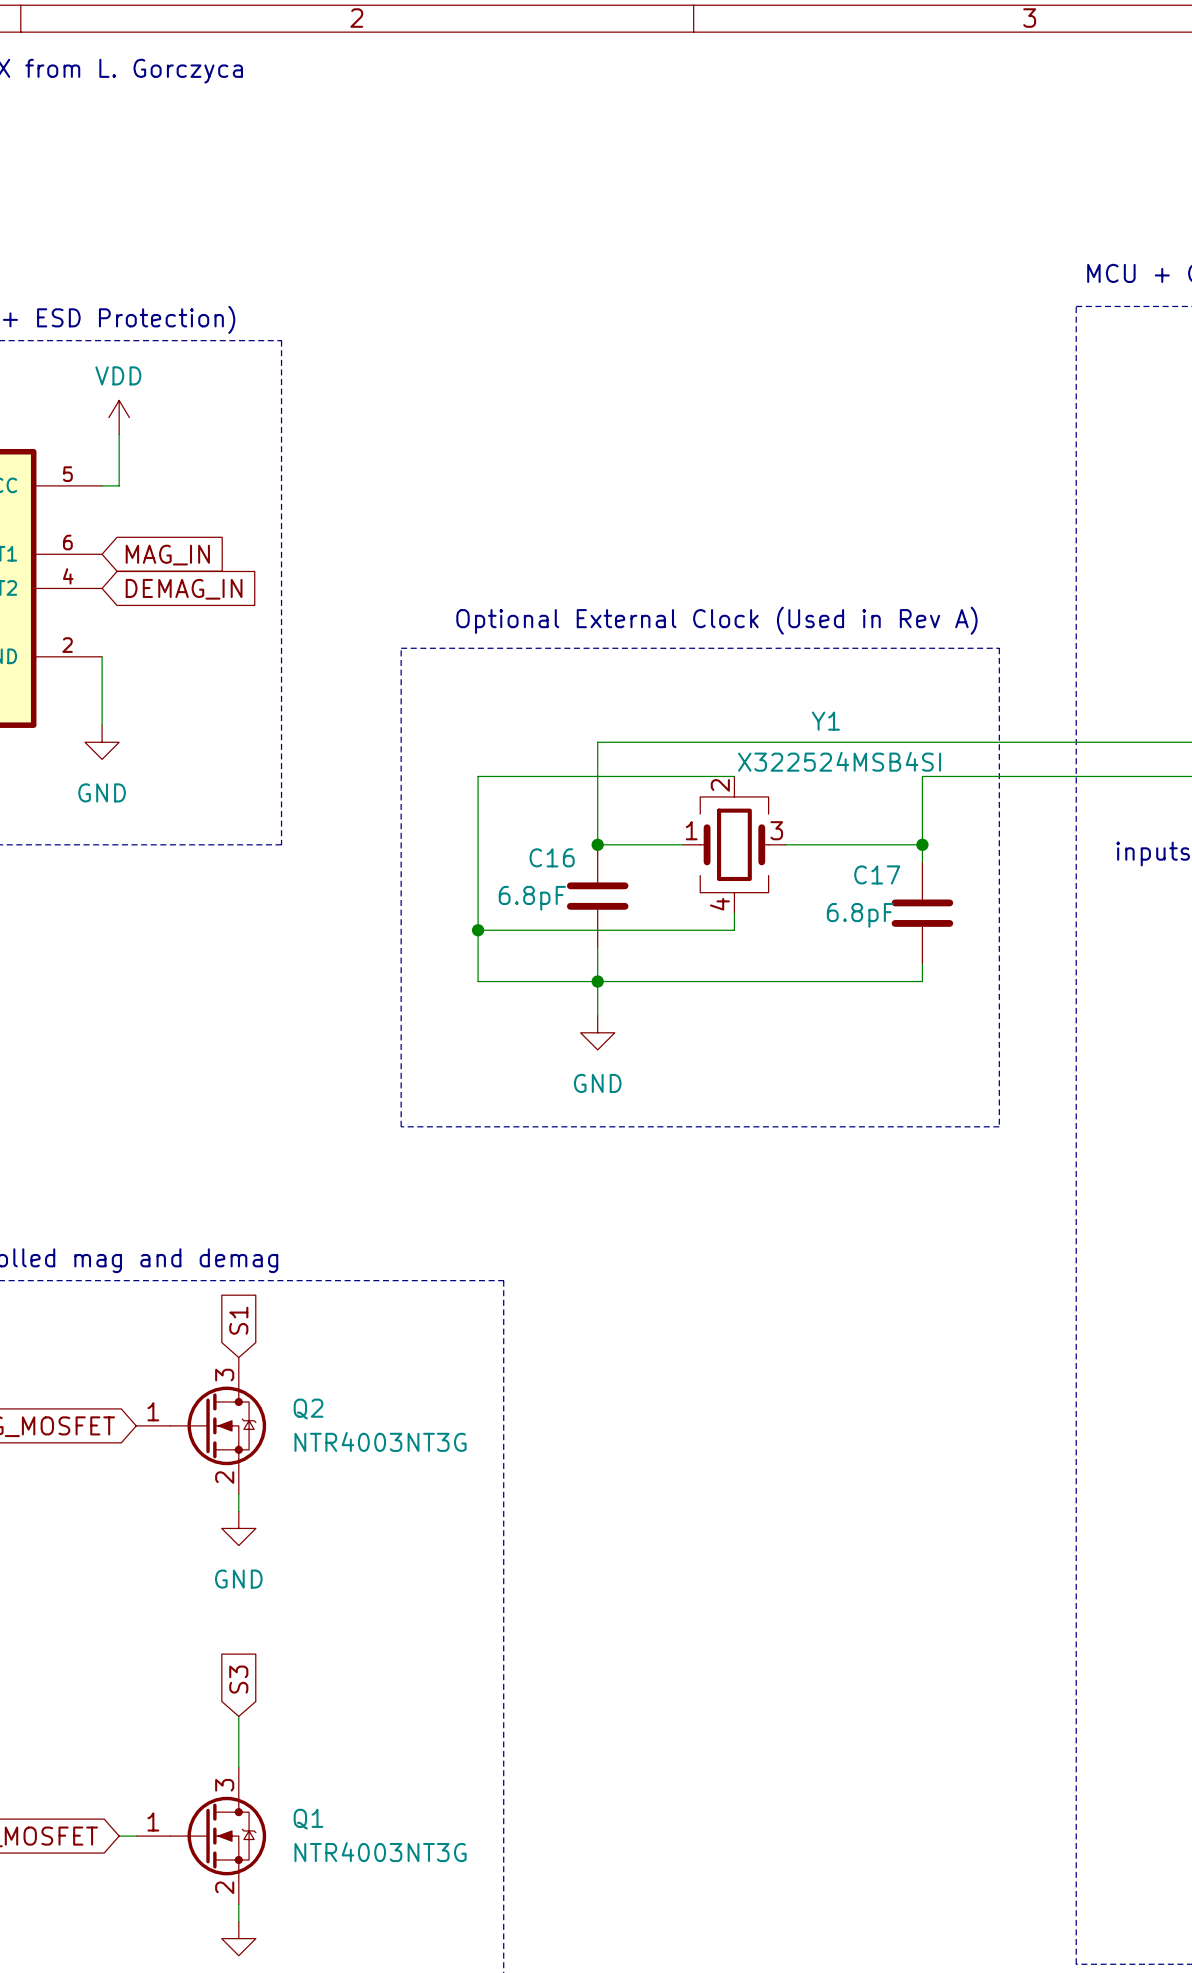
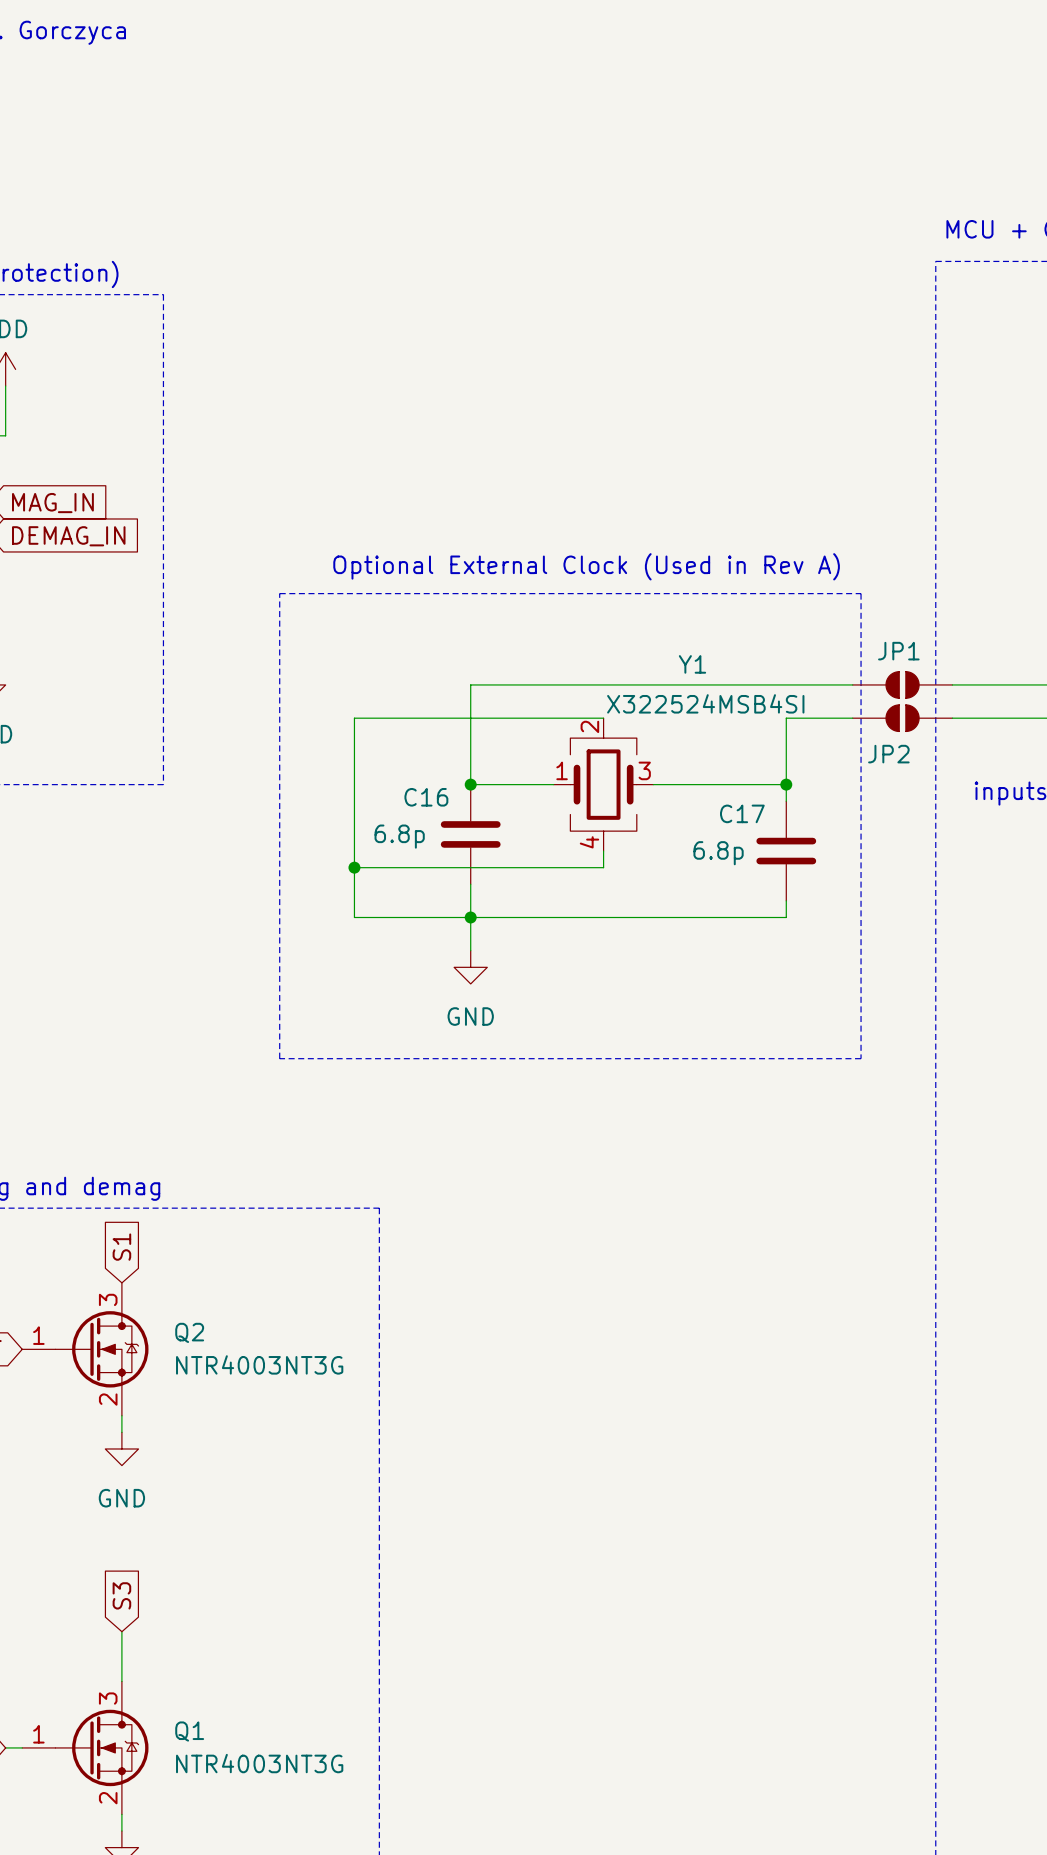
JP1: none -> (902, 684)
JP2: none -> (902, 718)
C16 value: 6.8pF (532, 898) -> 6.8p (399, 836)
C17 value: 6.8pF (860, 915) -> 6.8p (718, 853)

